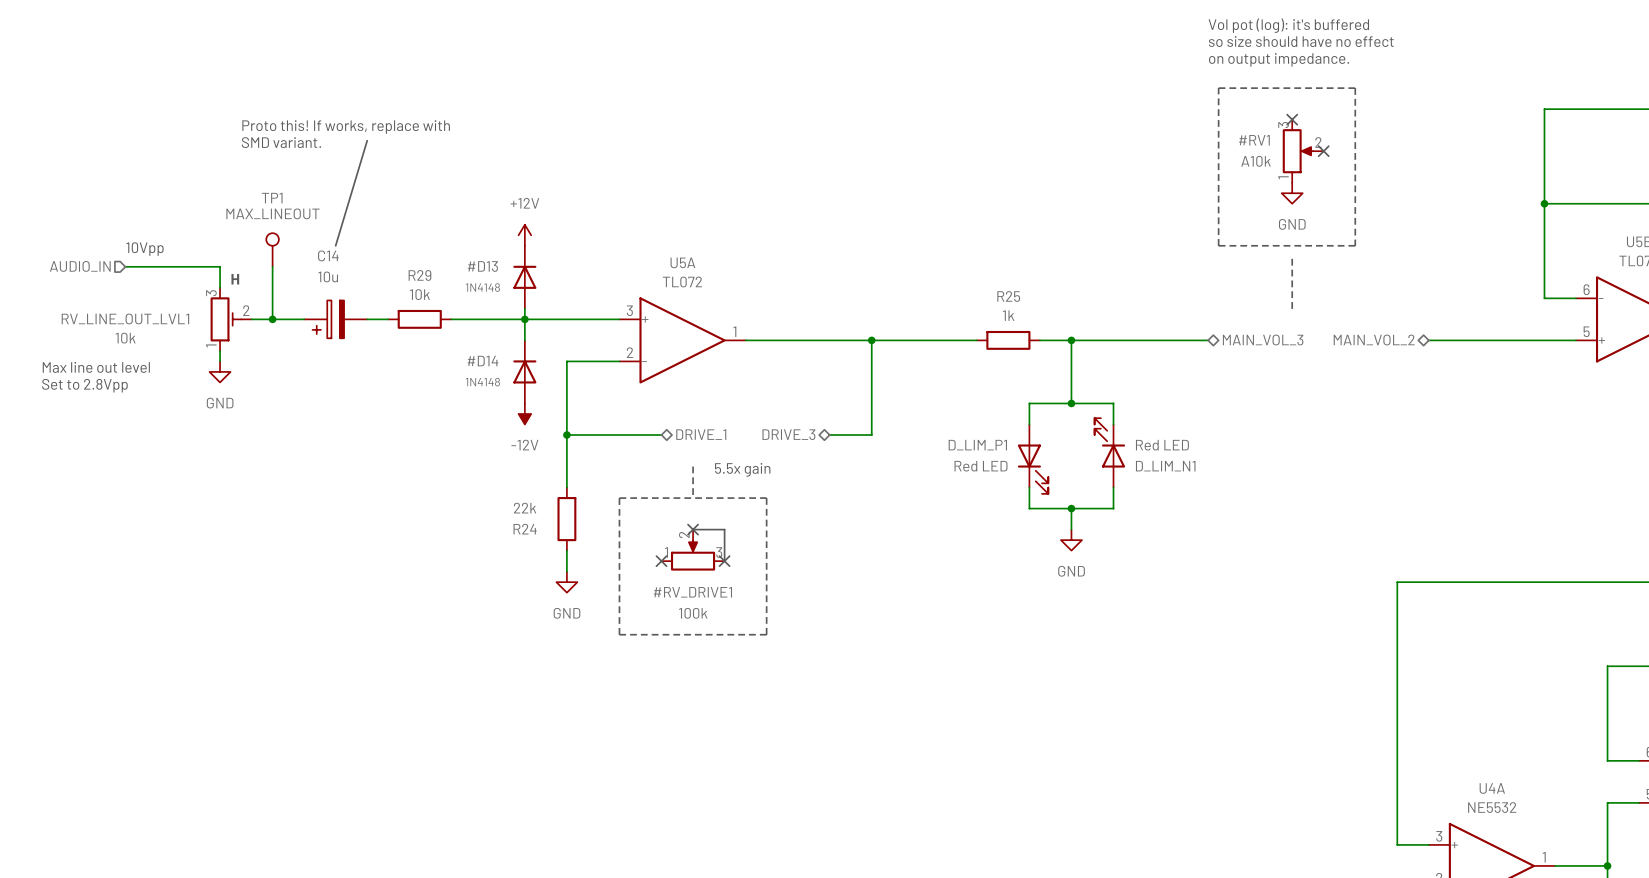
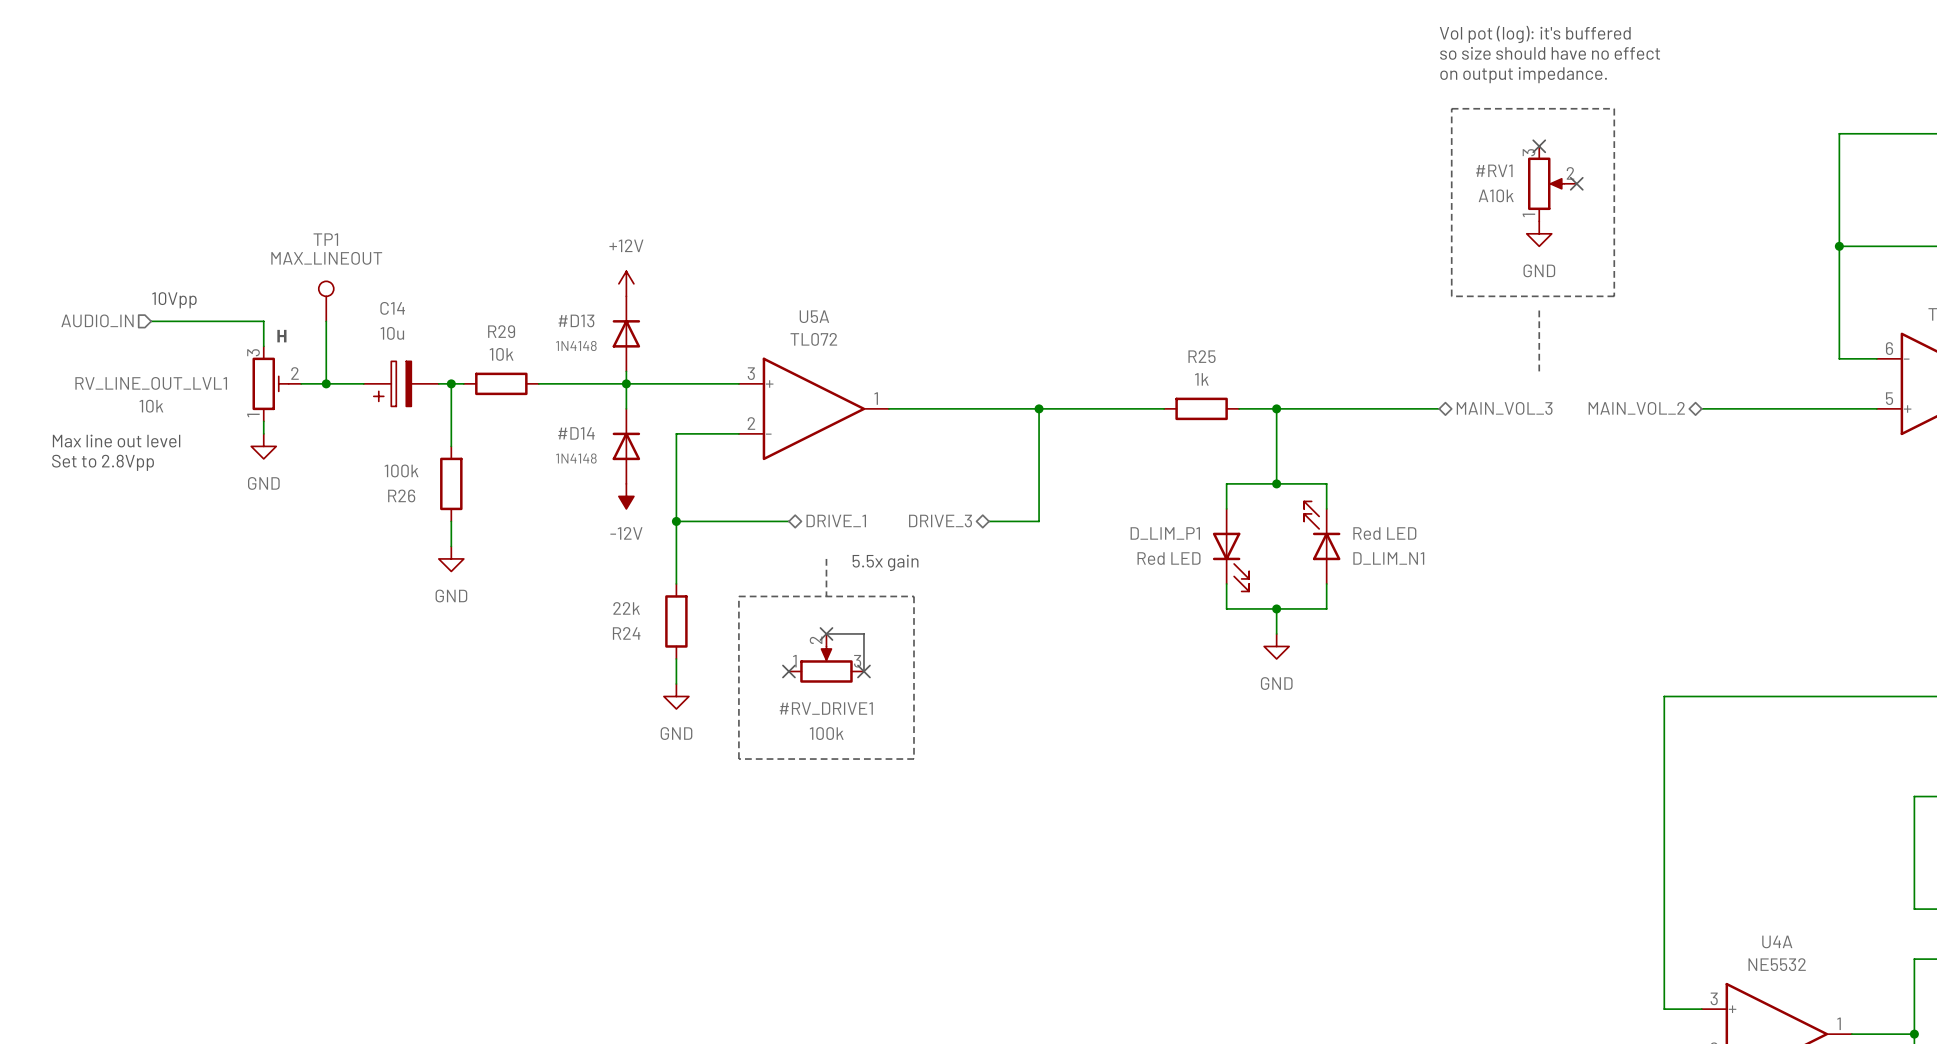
text: Proto this! If works, replace with (346, 127) -> none
line: (367, 140) (335, 245) -> none
text: SMD variant. (281, 142) -> none
wire: none -> (451, 383) (451, 446)
junction: none -> (451, 383)
R26: none -> 100k (451, 483)
wire: none -> (451, 521) (451, 546)
power symbol: none -> GND (451, 558)

